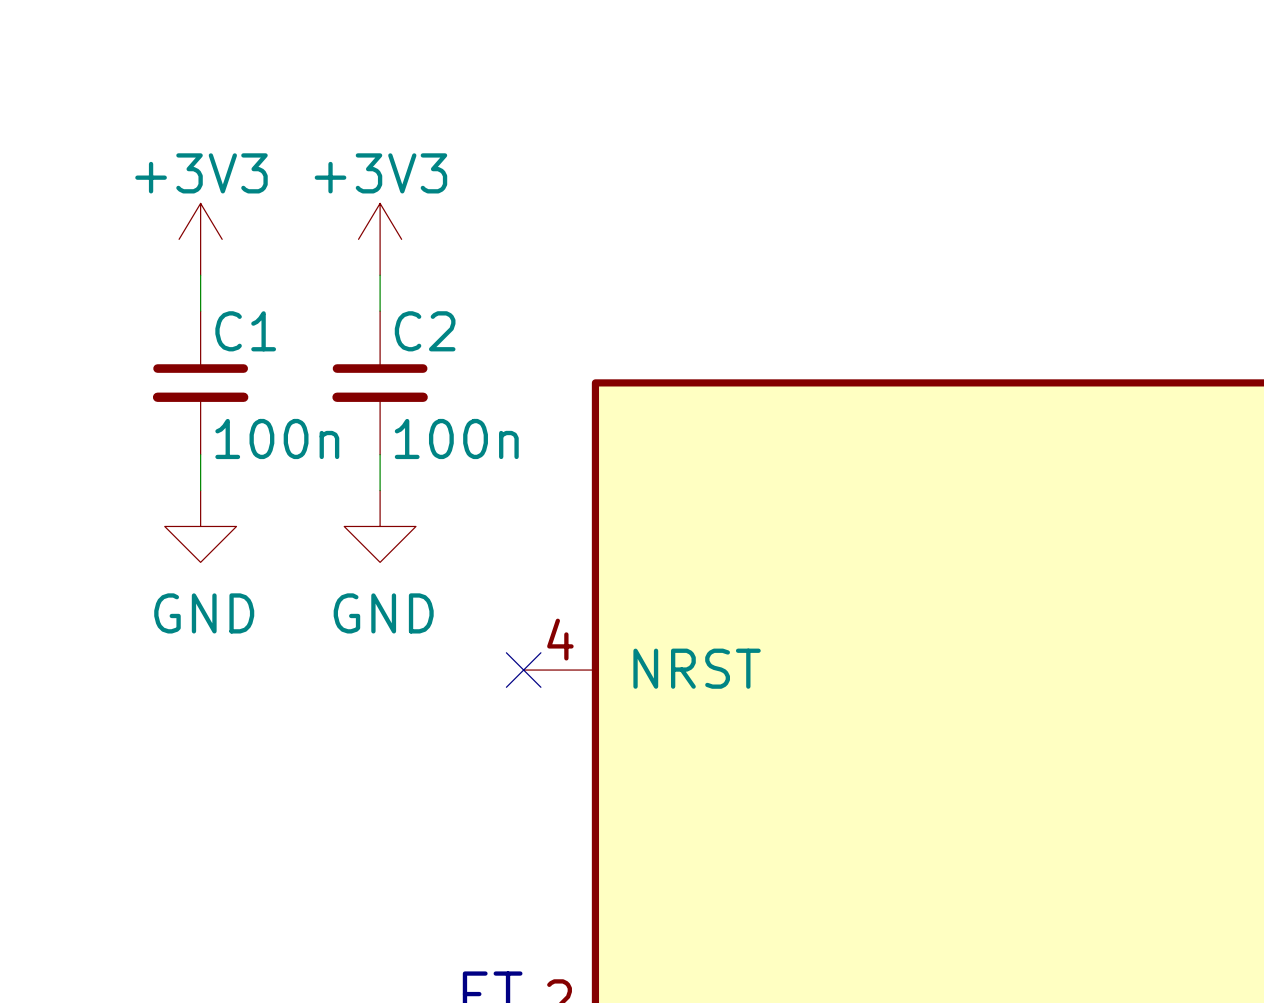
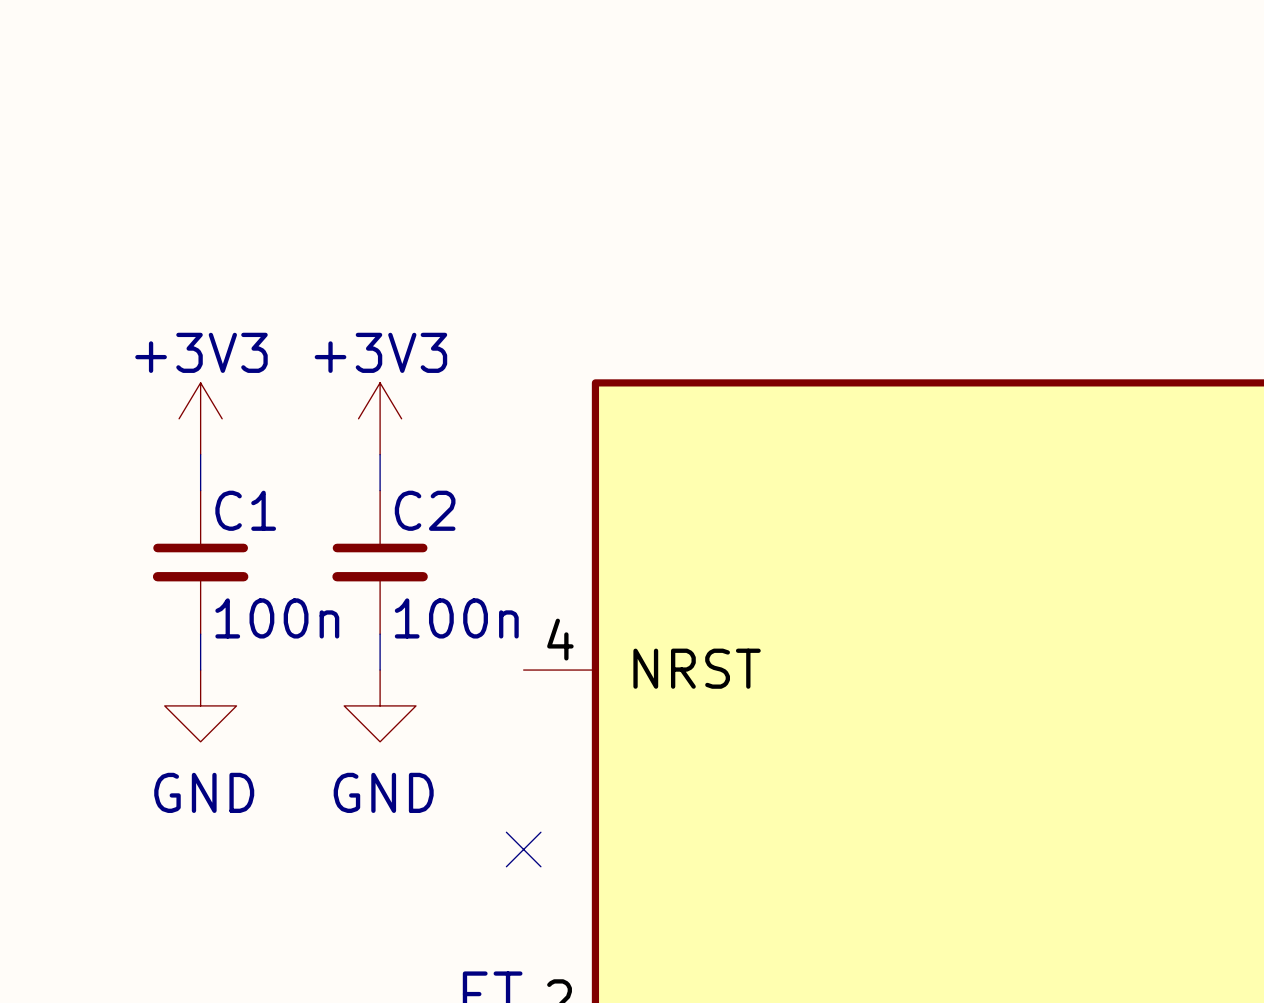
power symbol: +3V3 (200, 239) -> none
power symbol: +3V3 (380, 239) -> none
wire: (200, 275) (200, 311) -> (200, 634) (200, 670)
wire: (380, 275) (380, 311) -> (380, 634) (380, 670)
C1 position: (200, 382) -> (200, 562)
C2 position: (380, 382) -> (380, 562)
power symbol: none -> +3V3 (200, 418)
power symbol: none -> +3V3 (380, 418)
power symbol: GND (200, 526) -> none
power symbol: GND (380, 526) -> none
no-connect mark: (523, 670) -> none
power symbol: none -> GND (200, 705)
power symbol: none -> GND (380, 705)
no-connect mark: none -> (523, 849)

